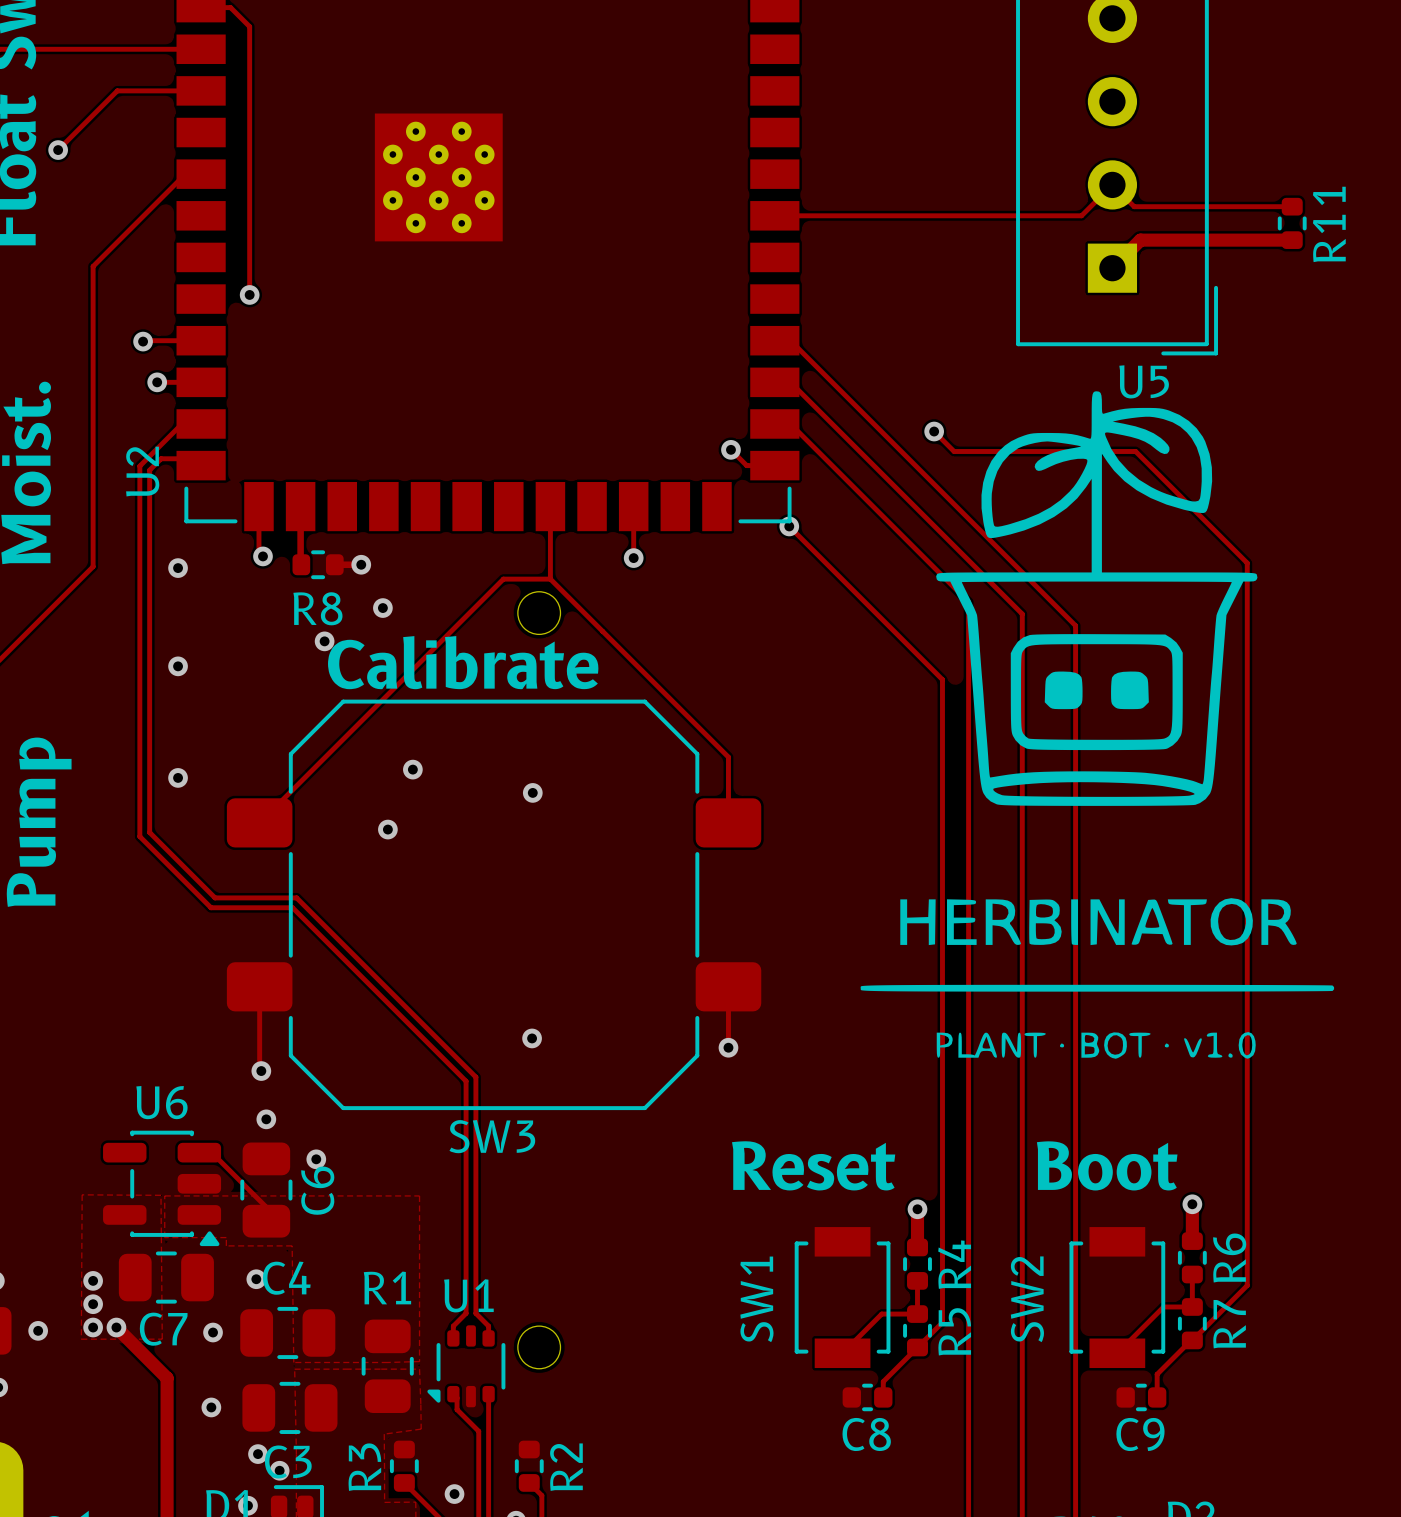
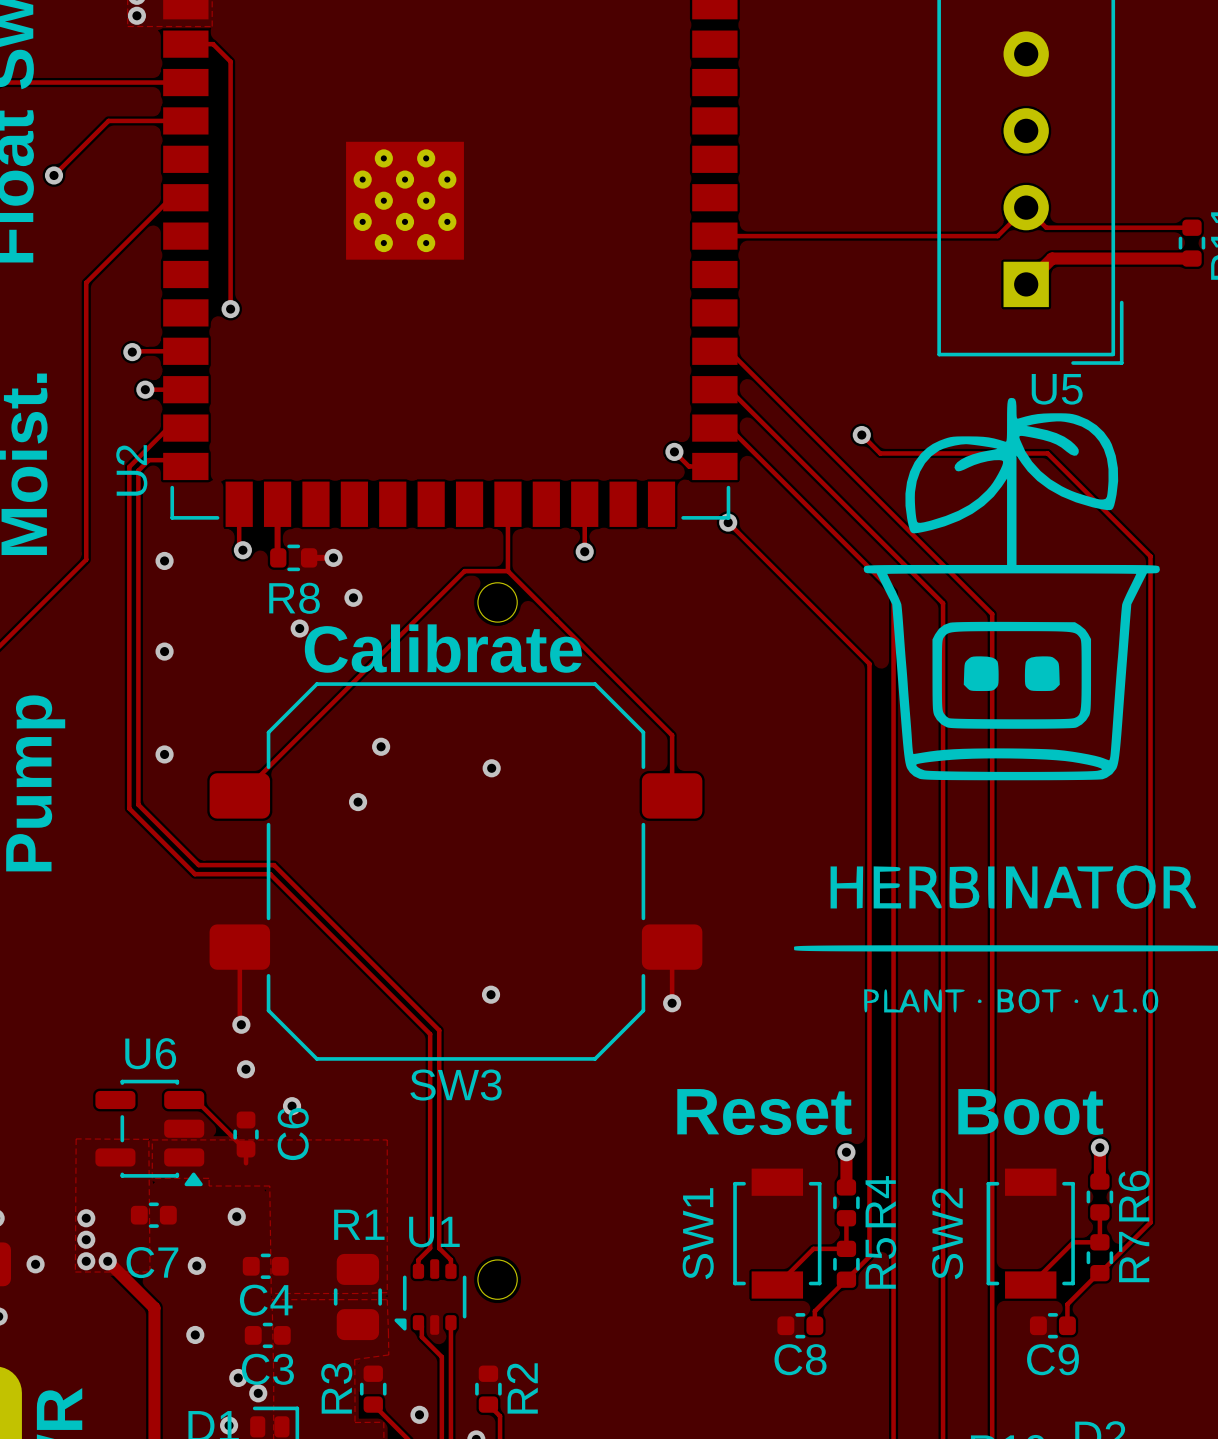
C6 footprint: [240, 1142, 293, 1238] -> [233, 1111, 259, 1158]
C7 footprint: [118, 1251, 214, 1304] -> [130, 1202, 177, 1228]
C4 name position: C4 (286, 1278) -> C4 (266, 1300)
C4 footprint: [240, 1306, 336, 1360] -> [242, 1253, 289, 1279]
C3 footprint: [242, 1381, 338, 1434] -> [244, 1322, 291, 1349]
C3 name position: C3 (288, 1461) -> C3 (267, 1369)

